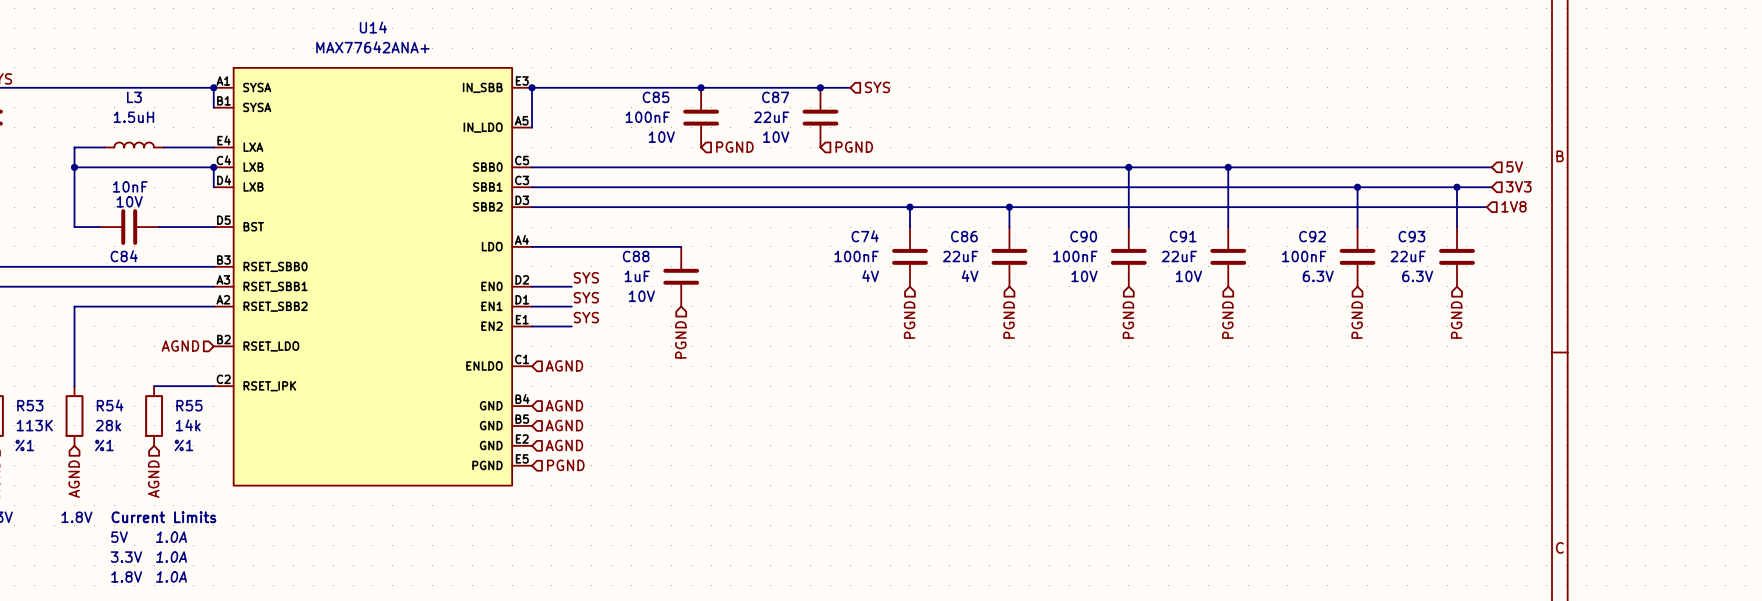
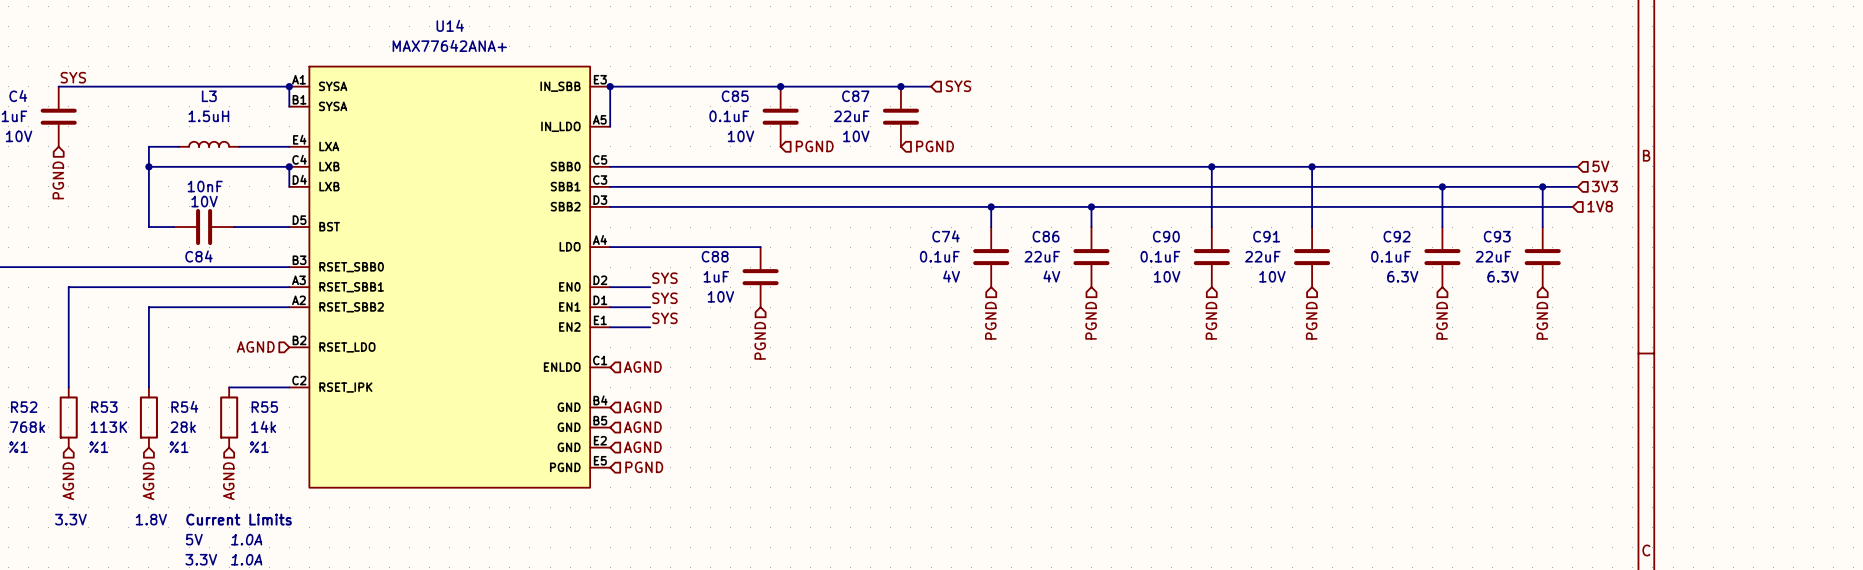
C85 value: 100nF (647, 117) -> 0.1uF (729, 116)
C74 value: 100nF (856, 256) -> 0.1uF (939, 256)
C90 value: 100nF (1075, 256) -> 0.1uF (1160, 256)
C92 value: 100nF (1304, 256) -> 0.1uF (1391, 256)

